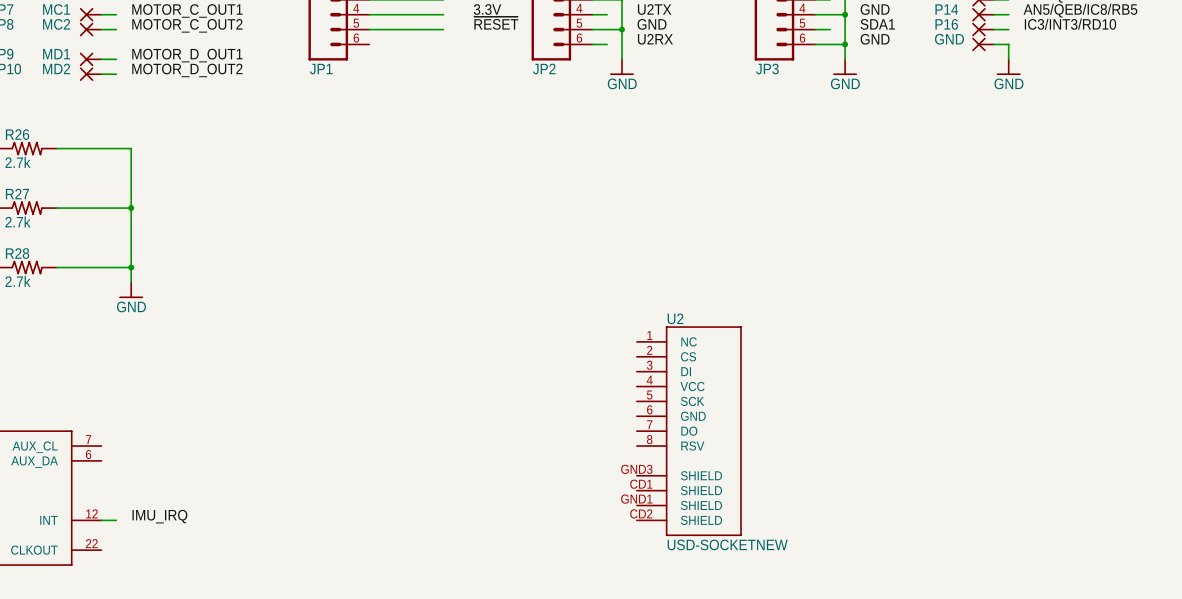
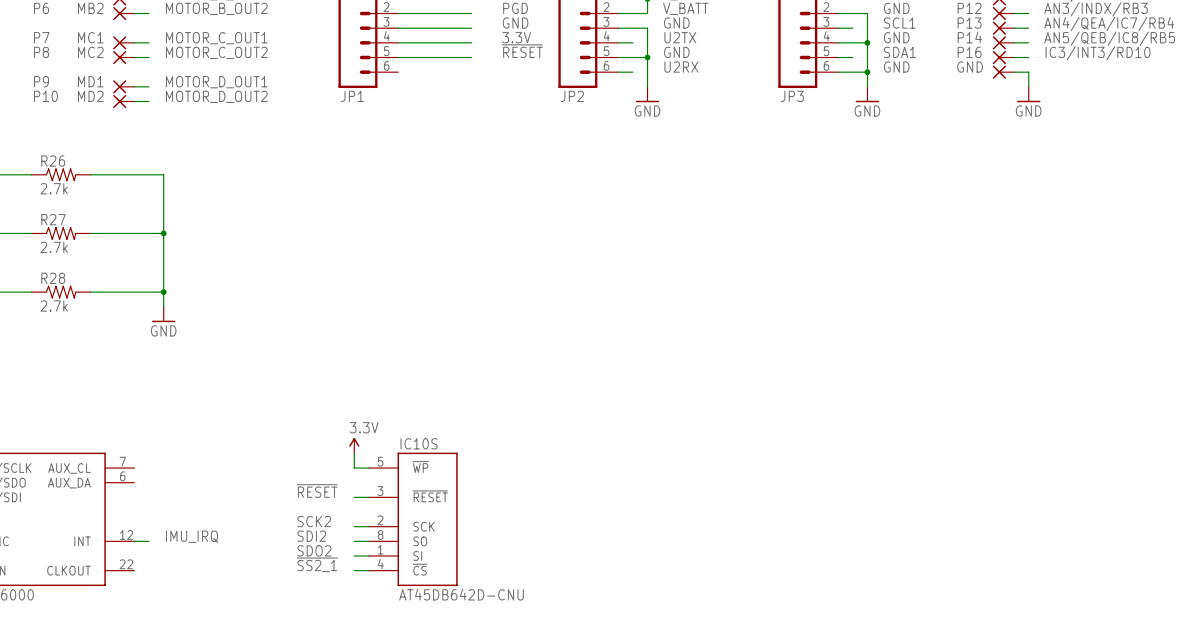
power symbol: none -> 3.3V (354, 445)
wire: none -> (354, 453) (354, 468) (368, 468)
U2: USD-SOCKETNEW (689, 431) -> none
label: none -> ~{RESET} (317, 491)
wire: none -> (354, 497) (368, 497)
IC10S: none -> AT45DB642D-CNU (413, 519)
label: none -> SCK2 (314, 521)
wire: none -> (354, 526) (368, 526)
label: none -> SDI2 (311, 536)
wire: none -> (354, 541) (368, 541)
label: none -> SDO2 (314, 550)
wire: none -> (354, 556) (368, 556)
label: none -> ~{SS2_1} (317, 564)
wire: none -> (354, 570) (368, 570)

